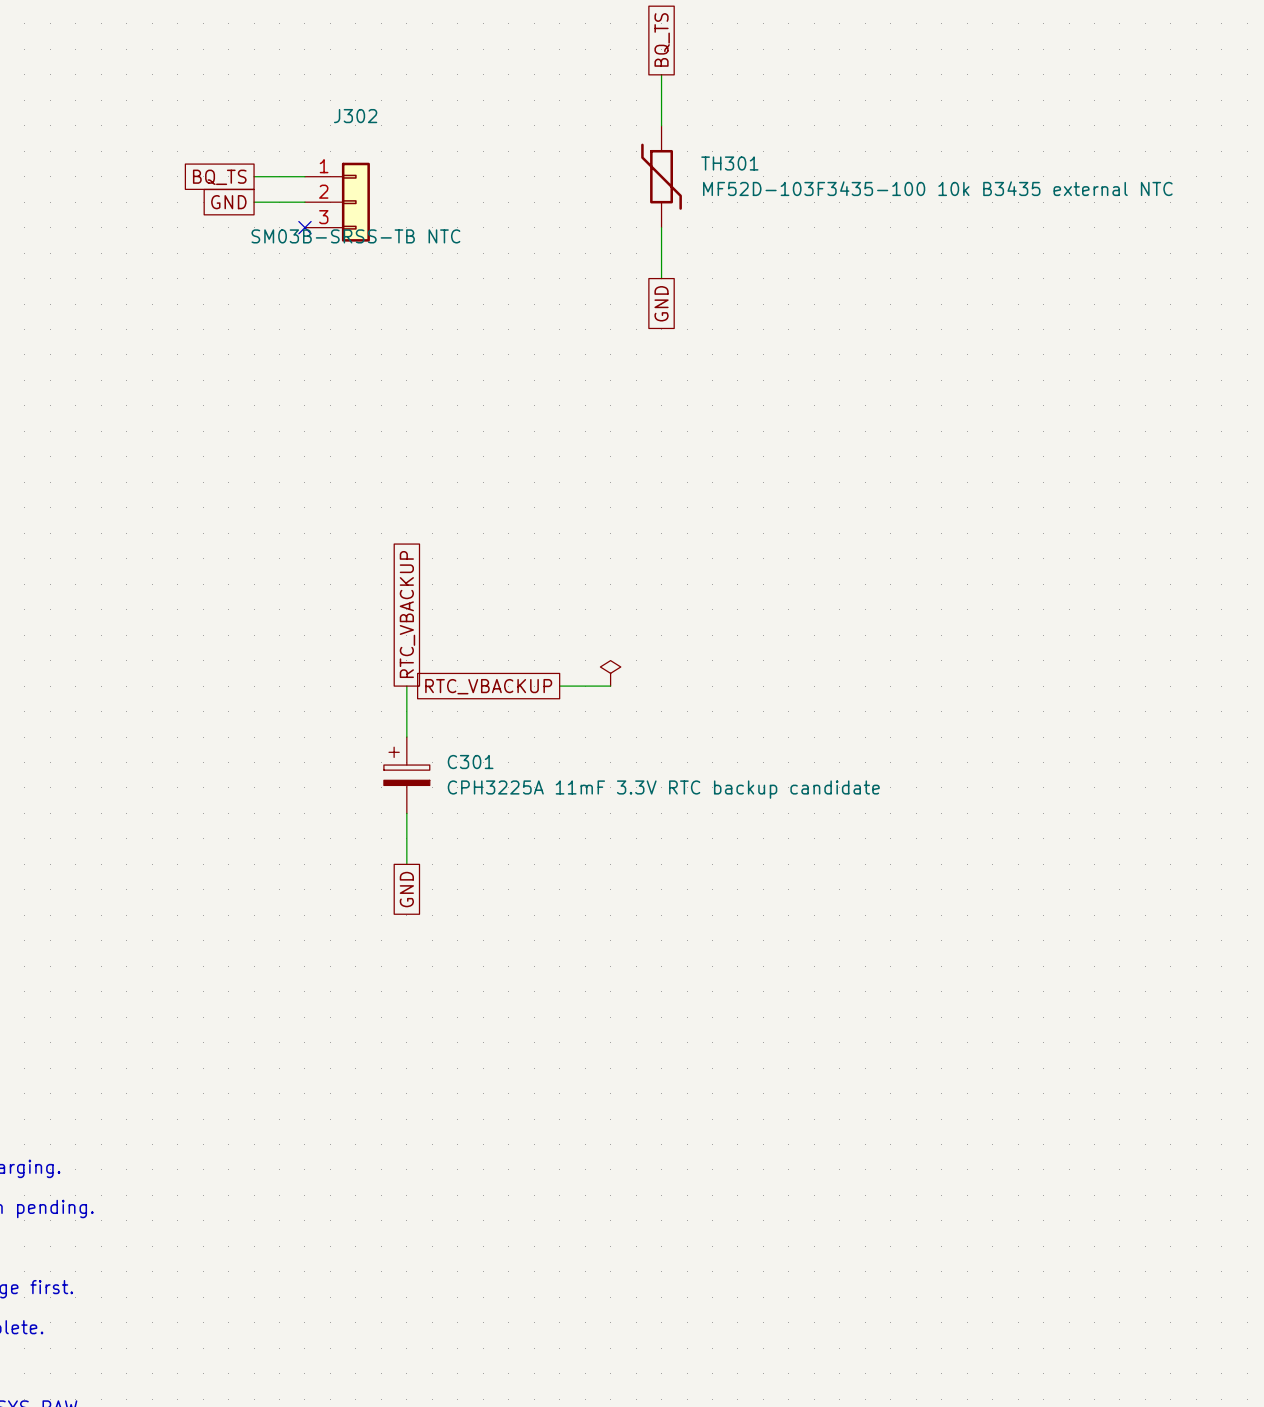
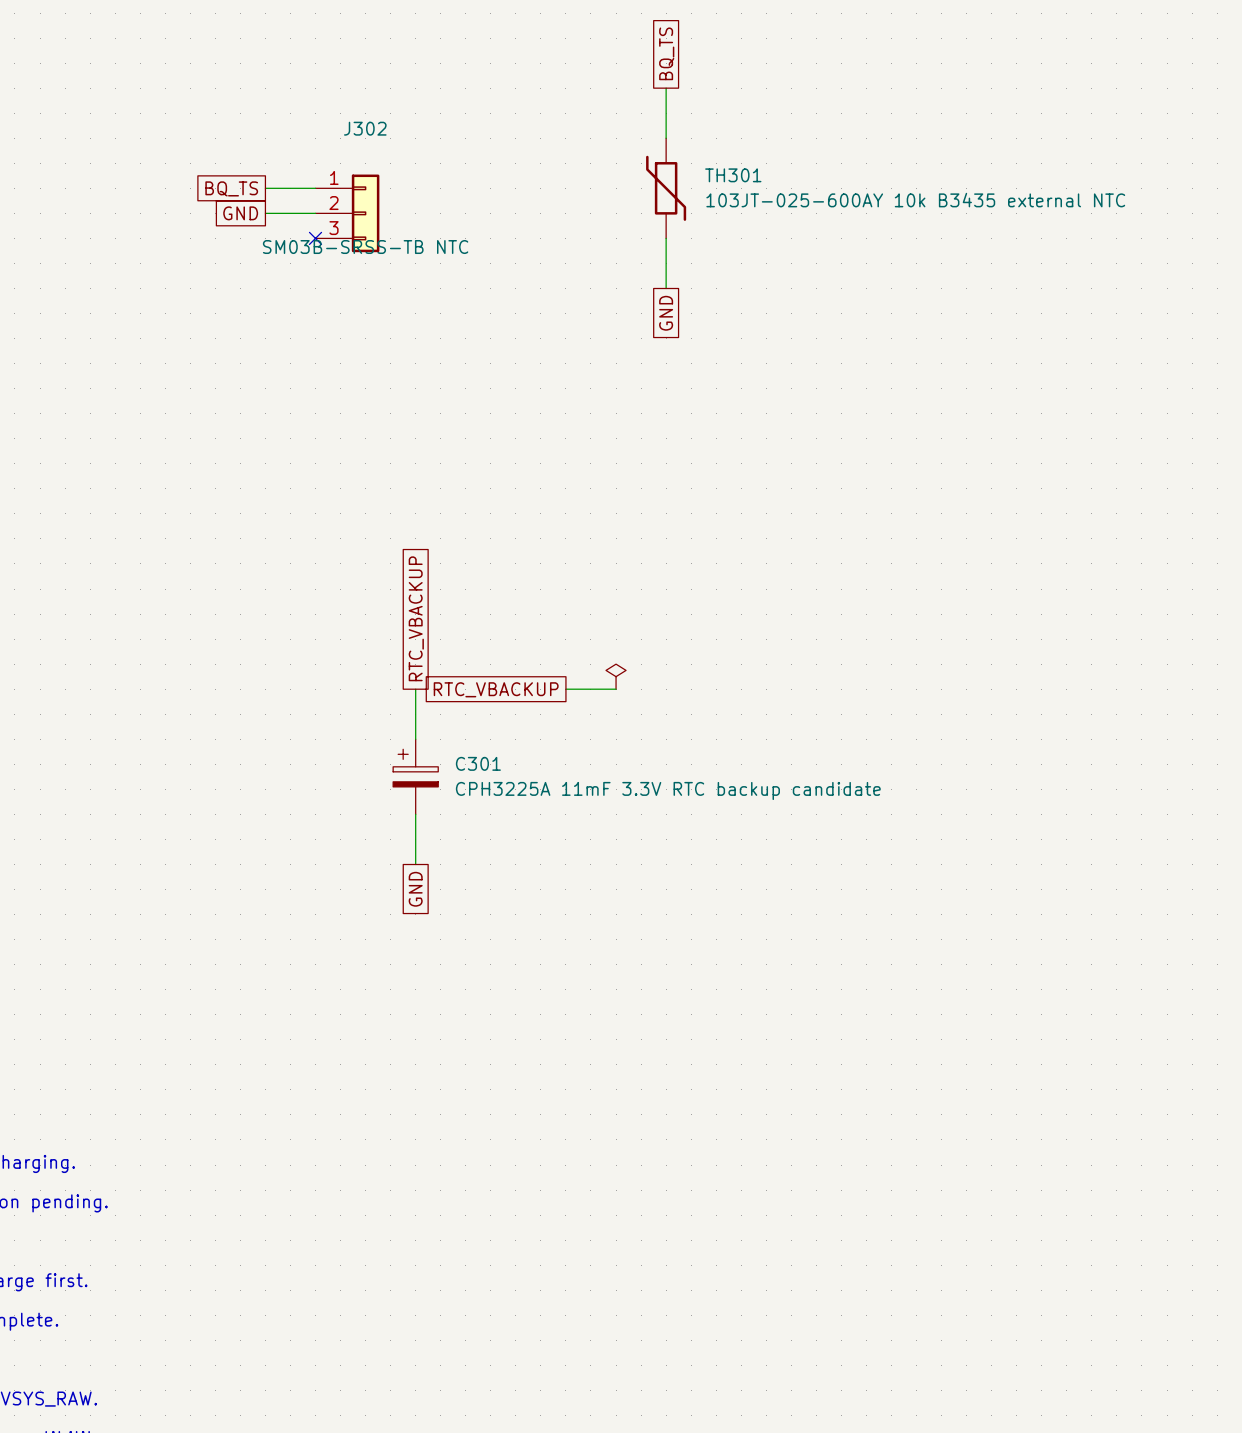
TH301 value: MF52D-103F3435-100 10k B3435 external NTC (937, 188) -> 103JT-025-600AY 10k B3435 external NTC (915, 200)

